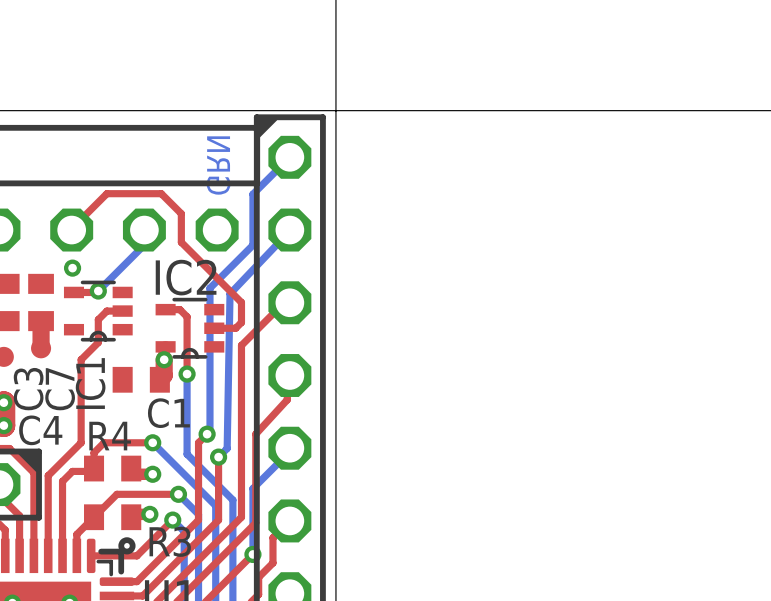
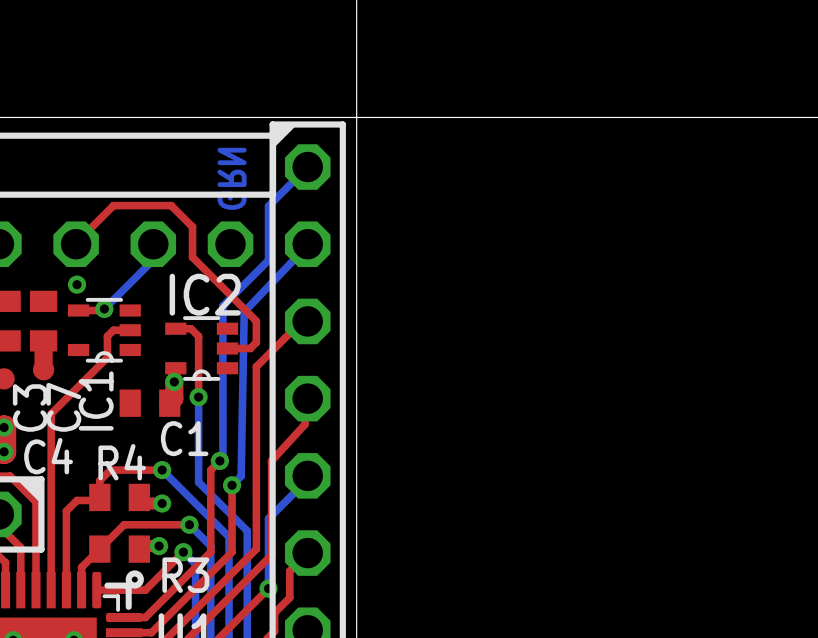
top track: (101, 316) (98, 319) (98, 342) (81, 359) (81, 442) (48, 475) -> (107, 336) (107, 357) (51, 413) (51, 505)

